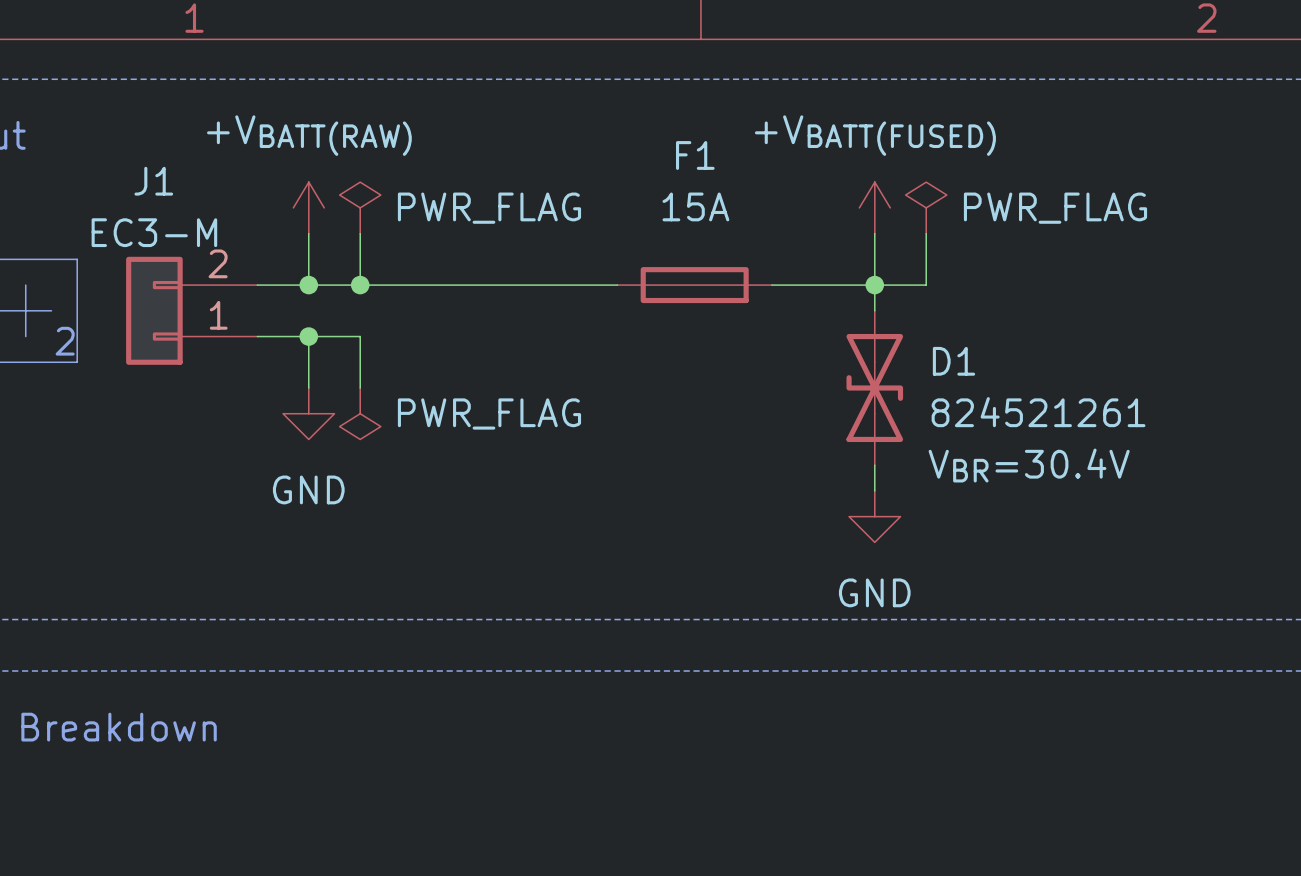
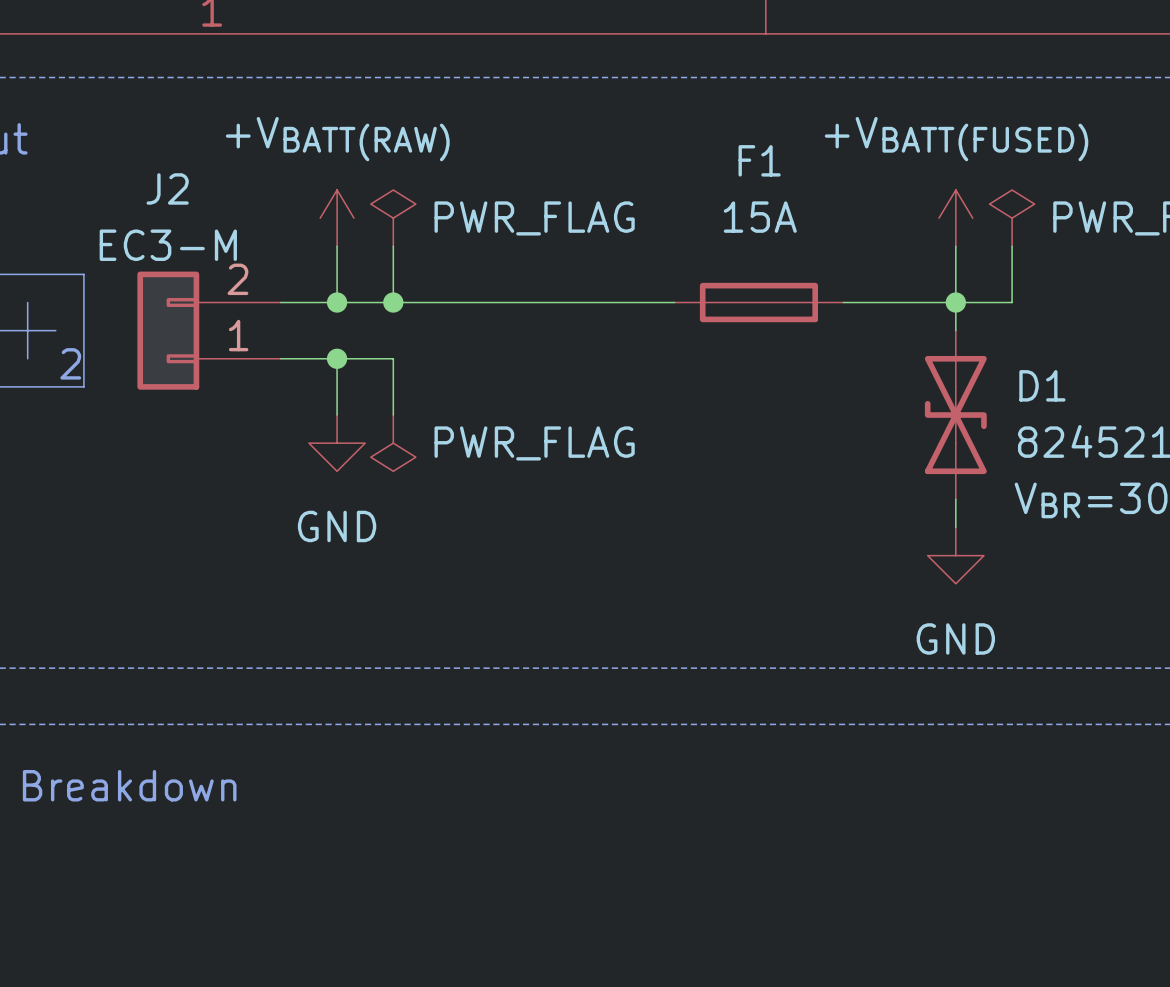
J1 name: J1 (153, 181) -> J2 (167, 188)

